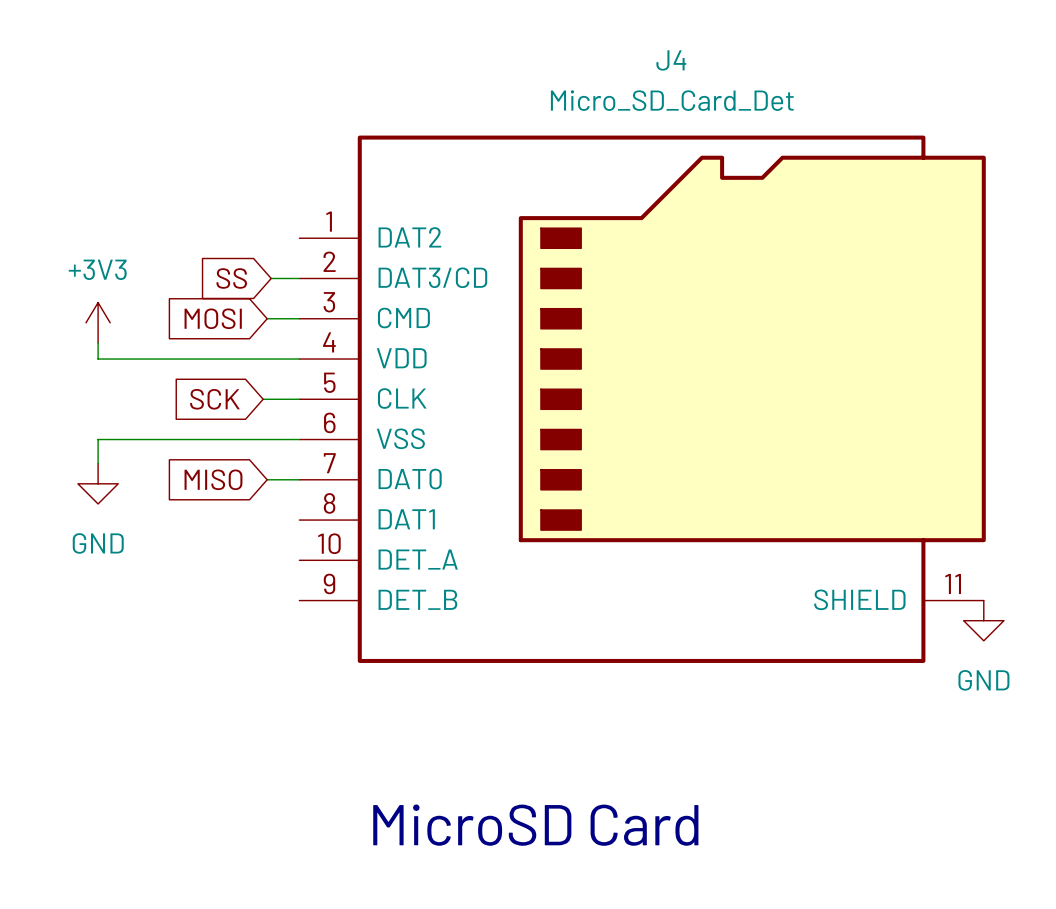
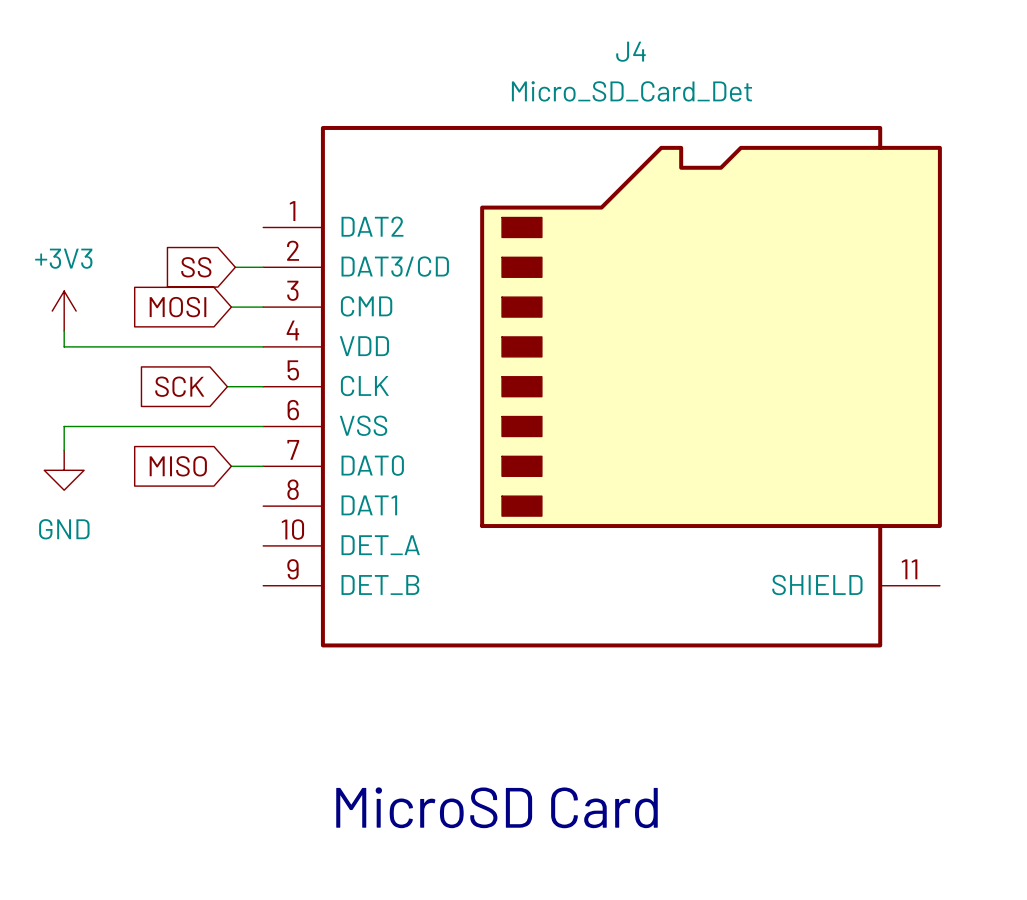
power symbol: GND (983, 620) -> none

